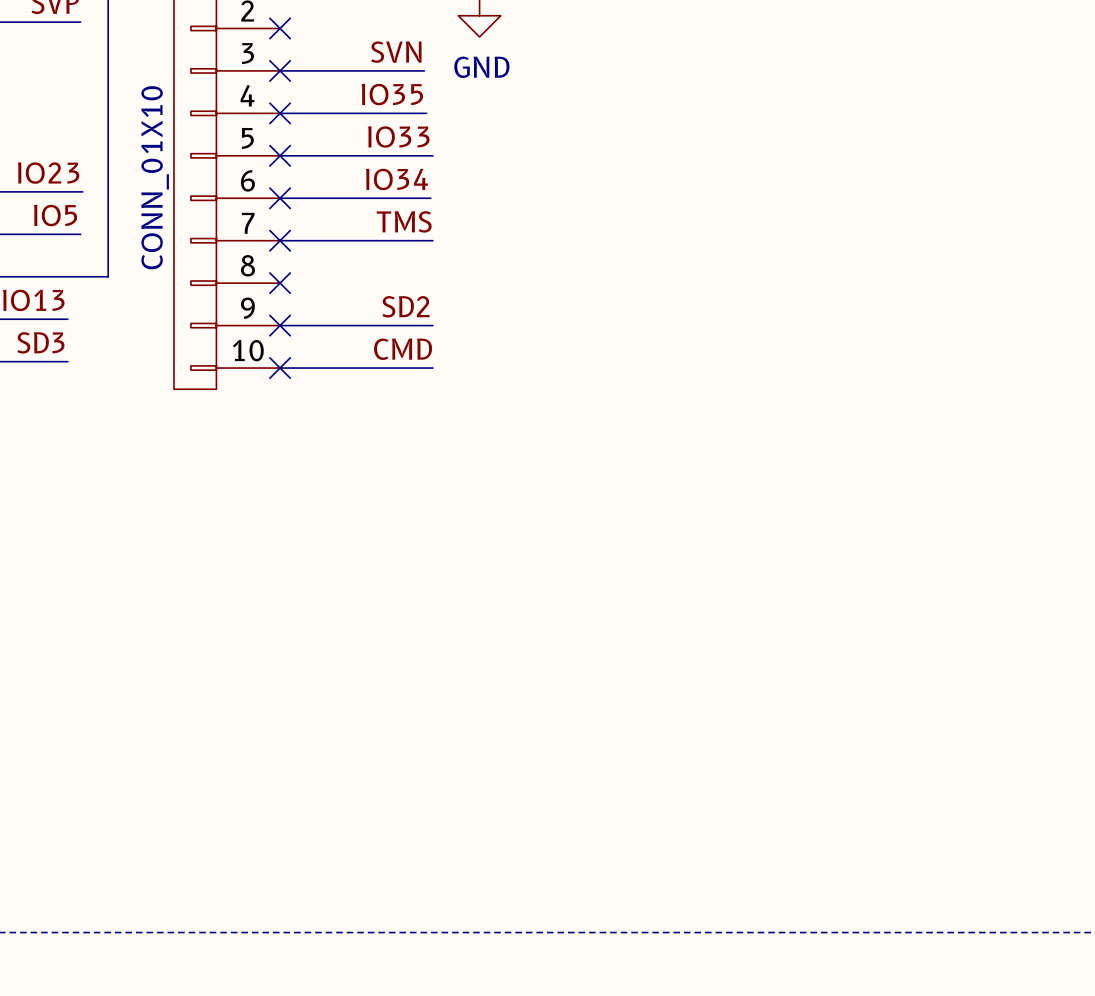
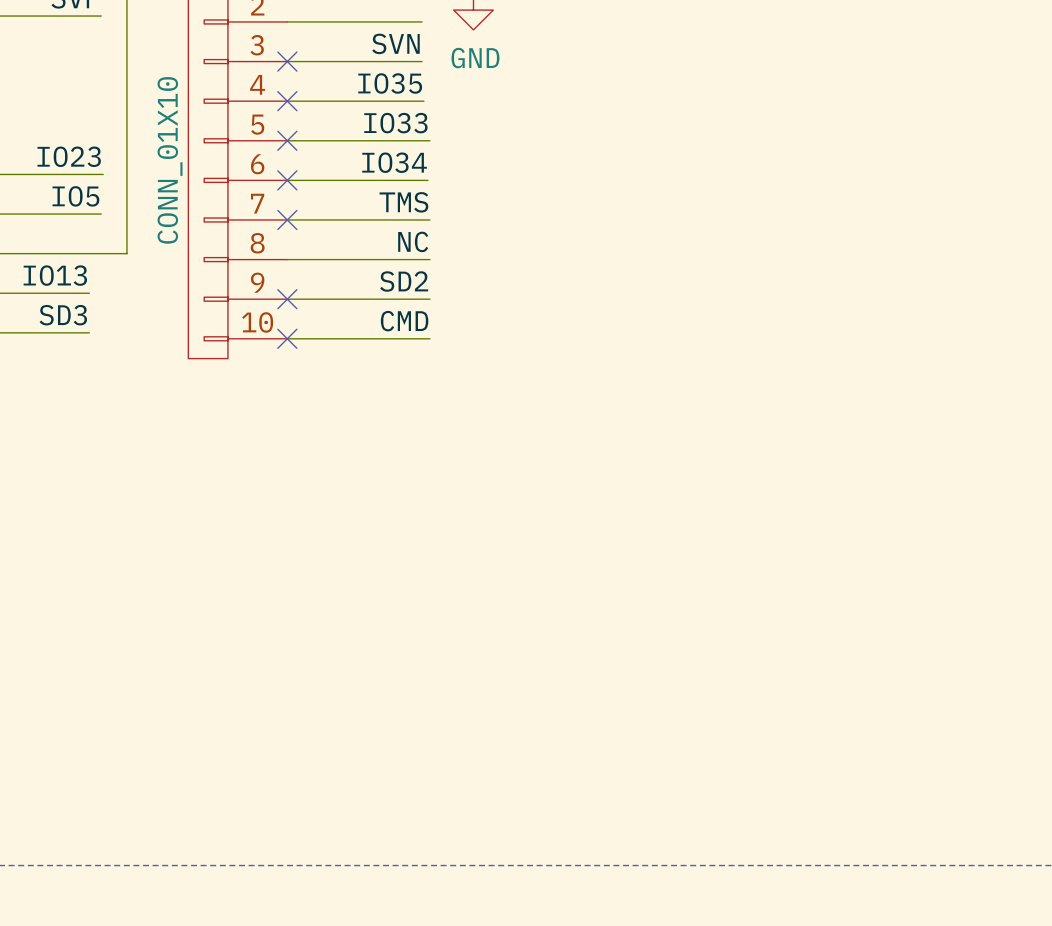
wire: none -> (287, 21) (422, 21)
no-connect mark: (280, 28) -> none
label: none -> NC (413, 241)
wire: none -> (287, 259) (429, 259)
no-connect mark: (280, 283) -> none

